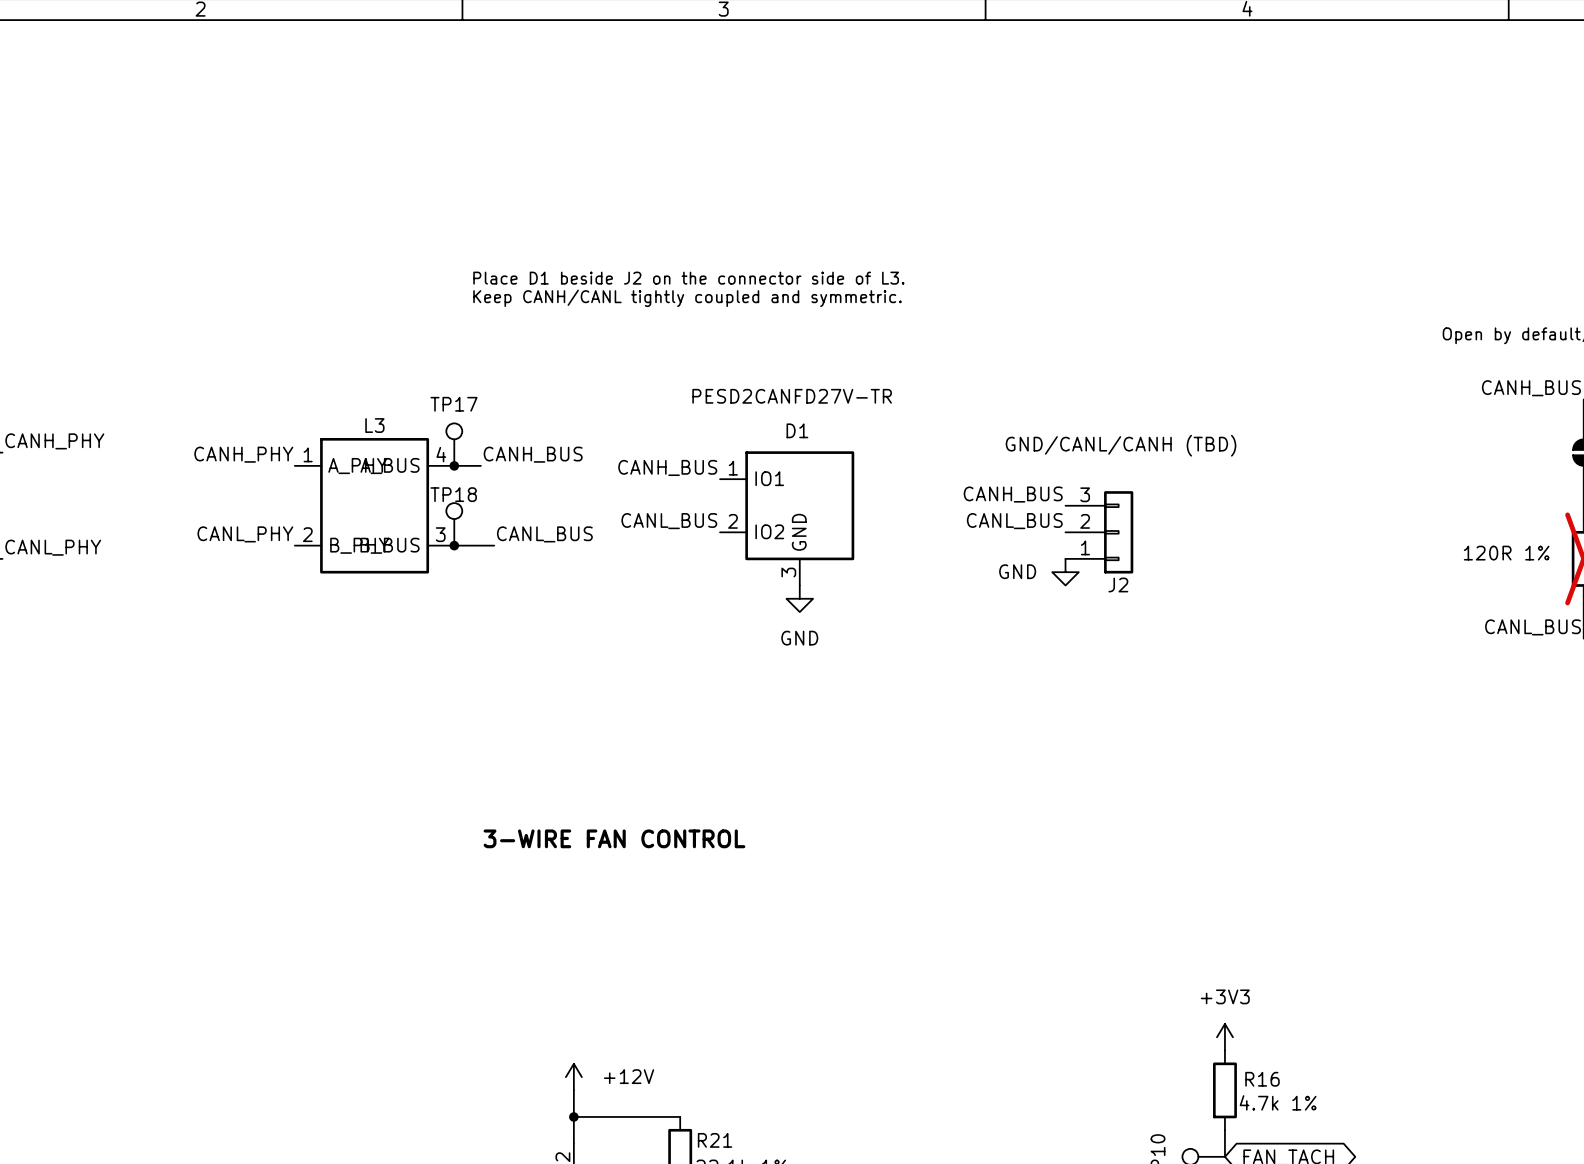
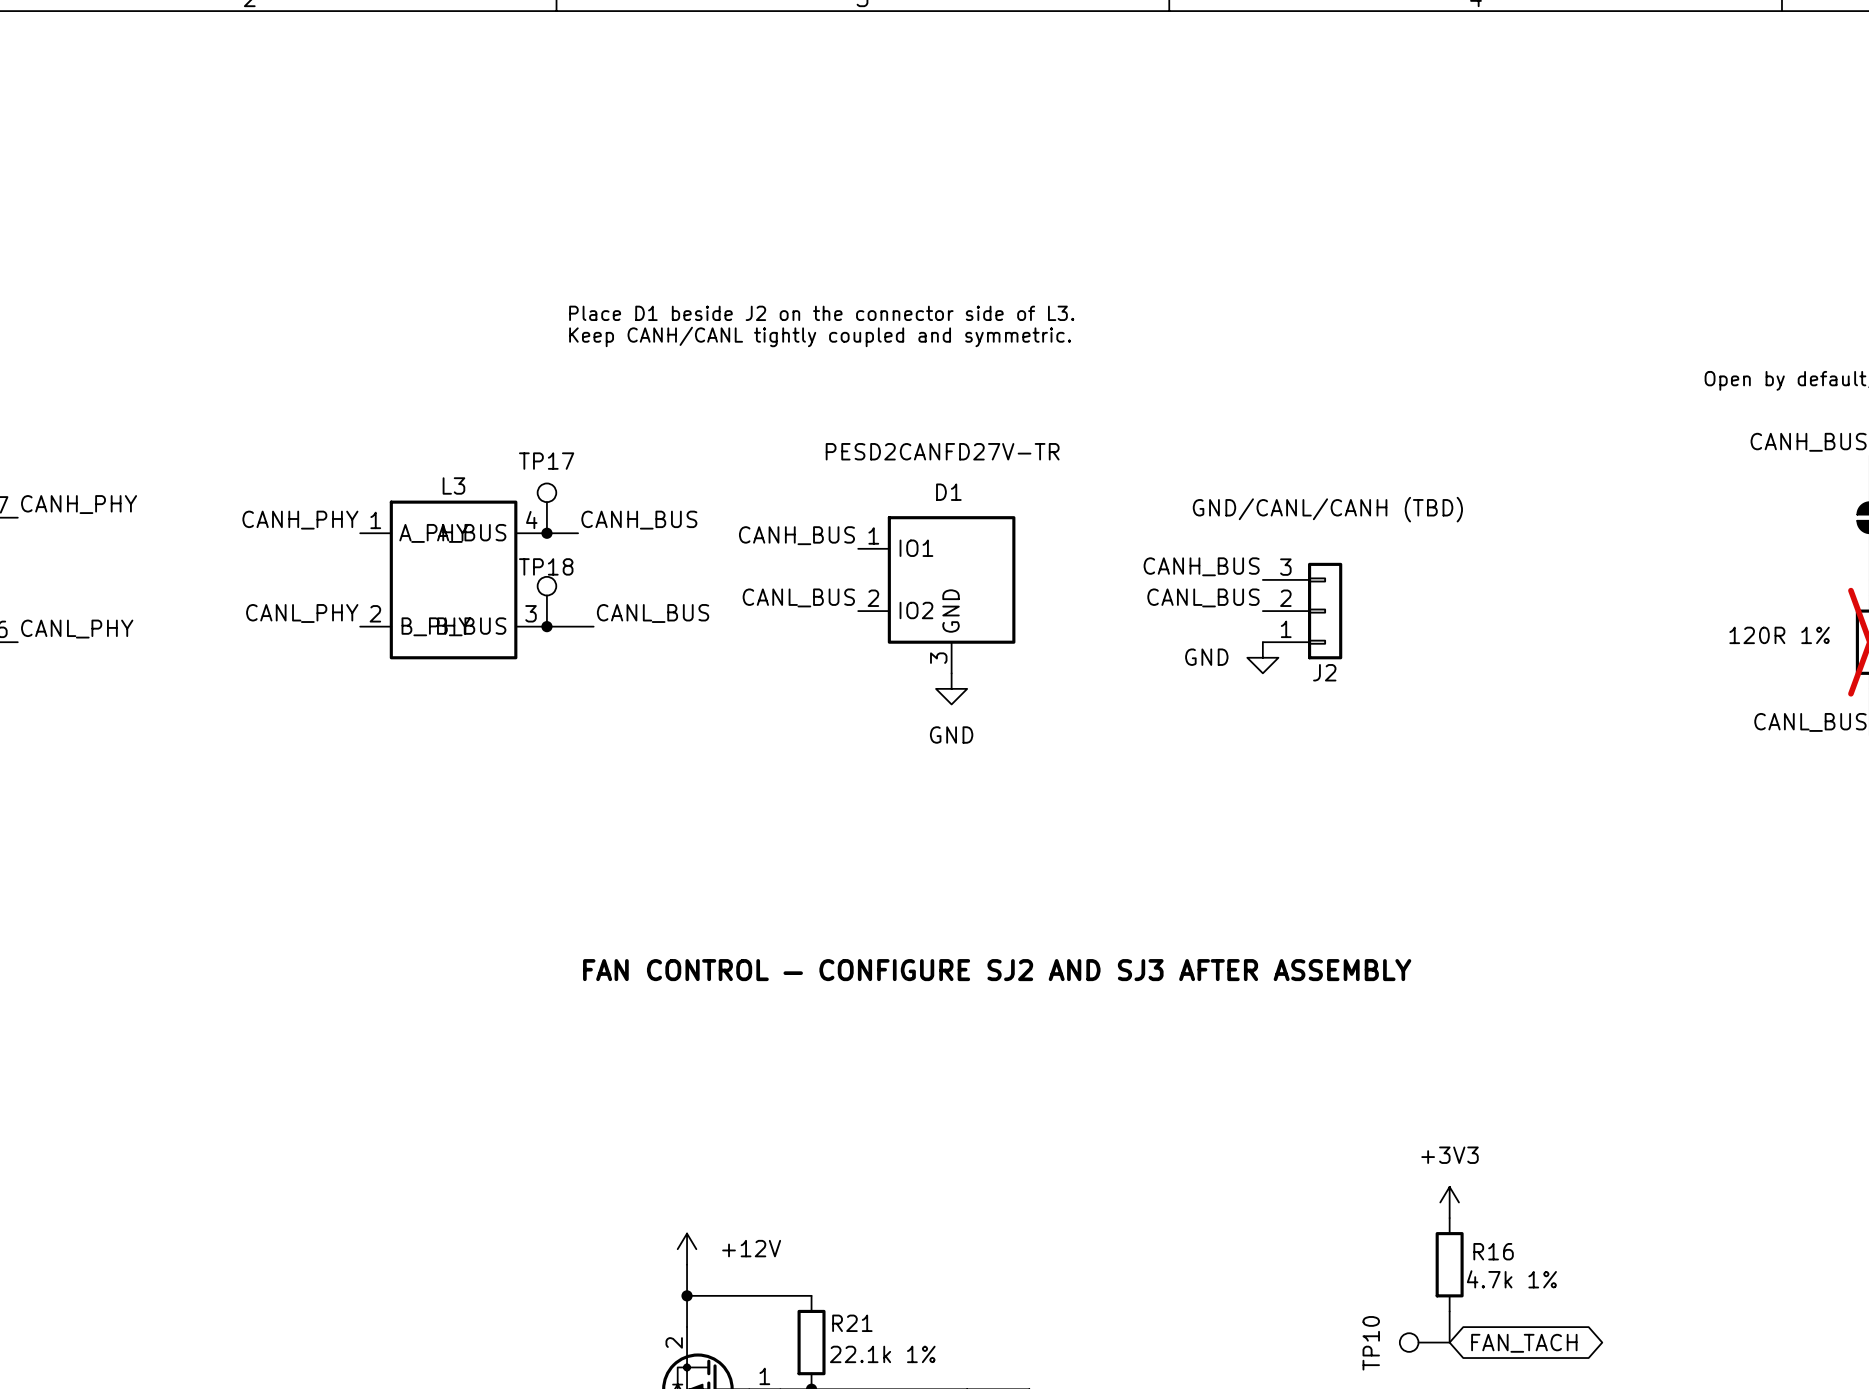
text: 3-WIRE FAN CONTROL (614, 838) -> FAN CONTROL — CONFIGURE SJ2 AND SJ3 AFTER ASSEMBLY (997, 970)

